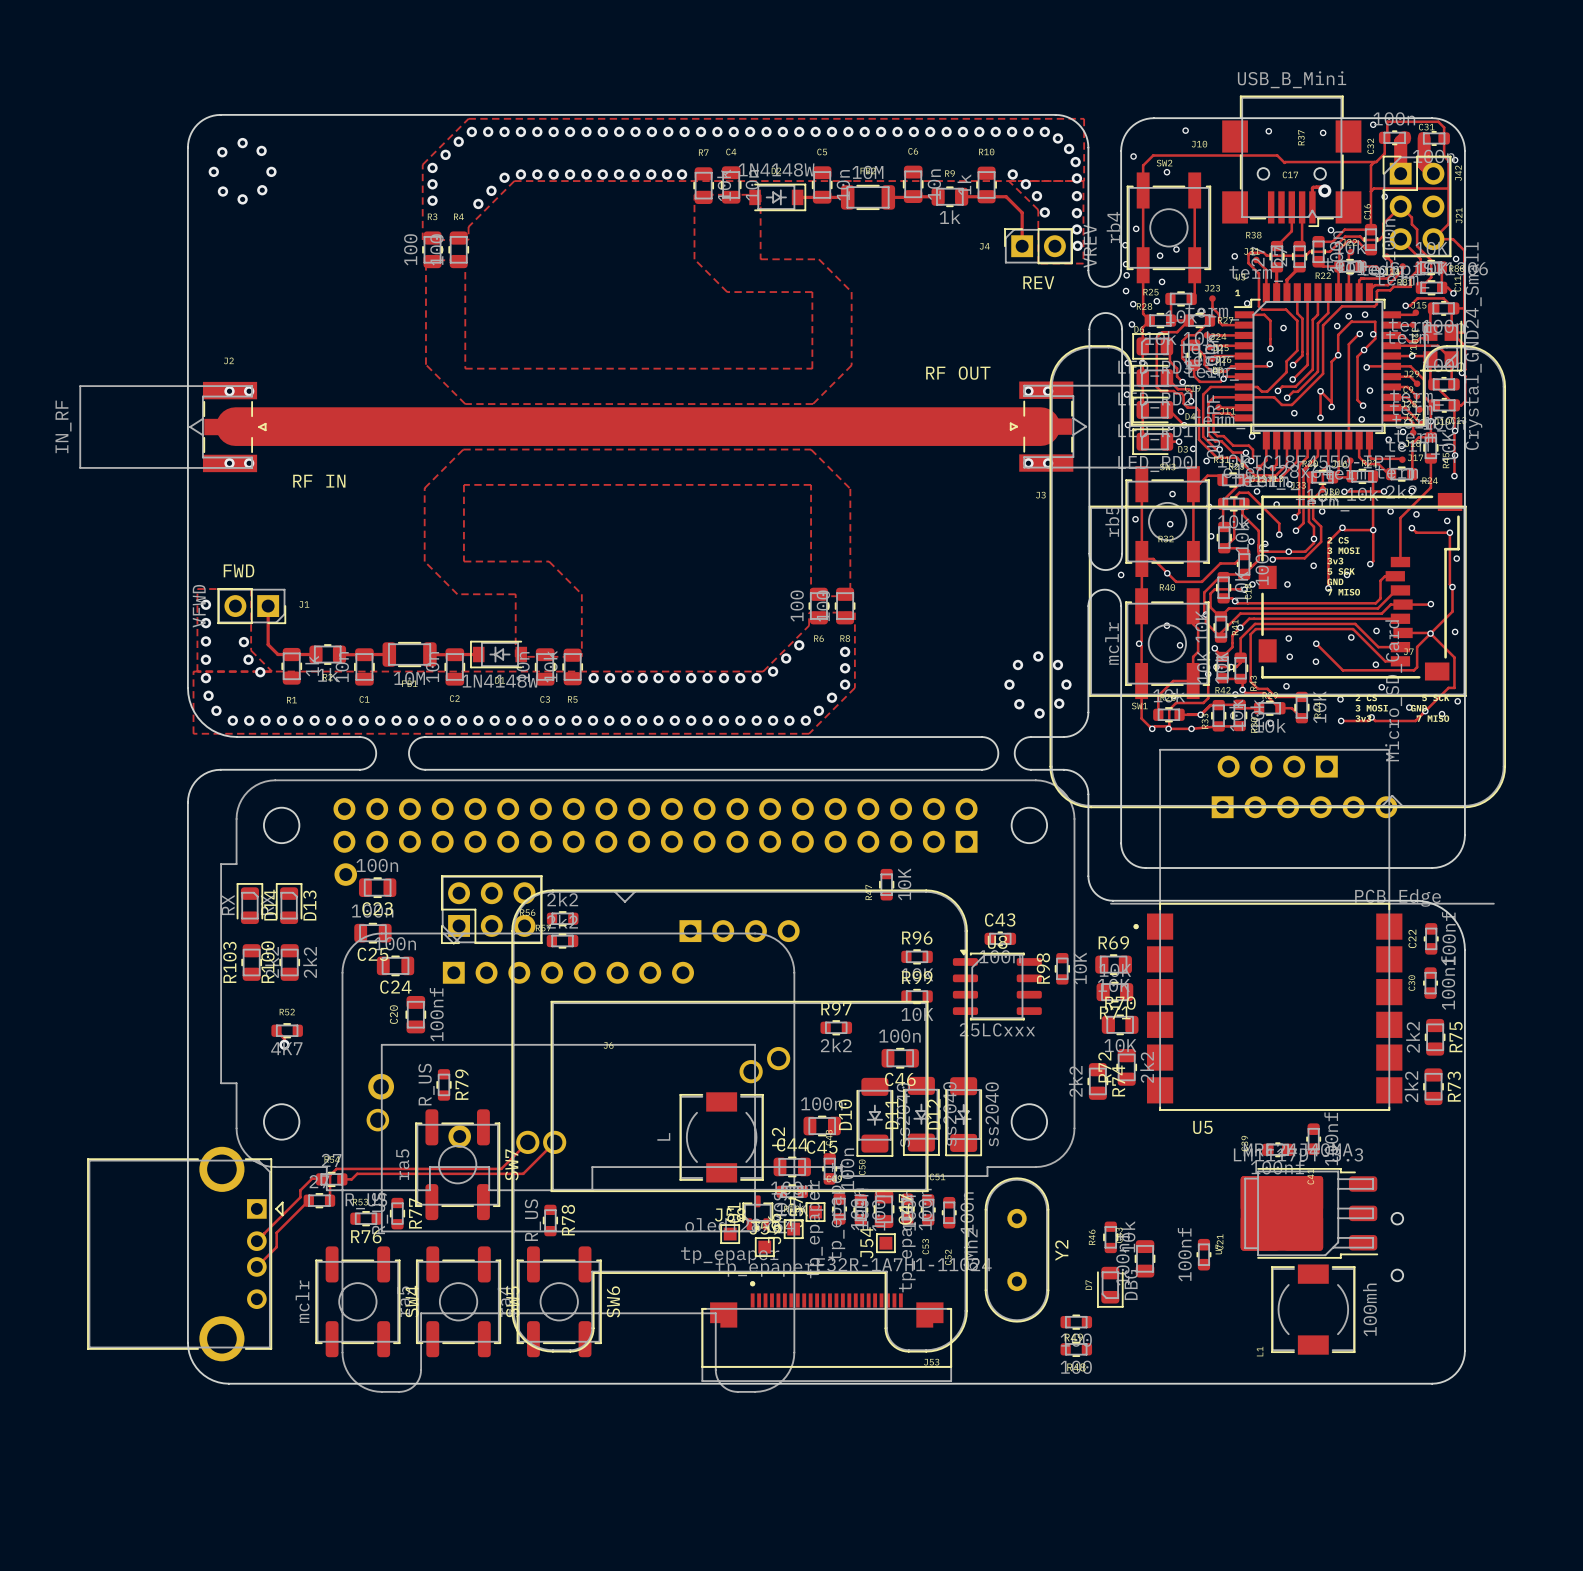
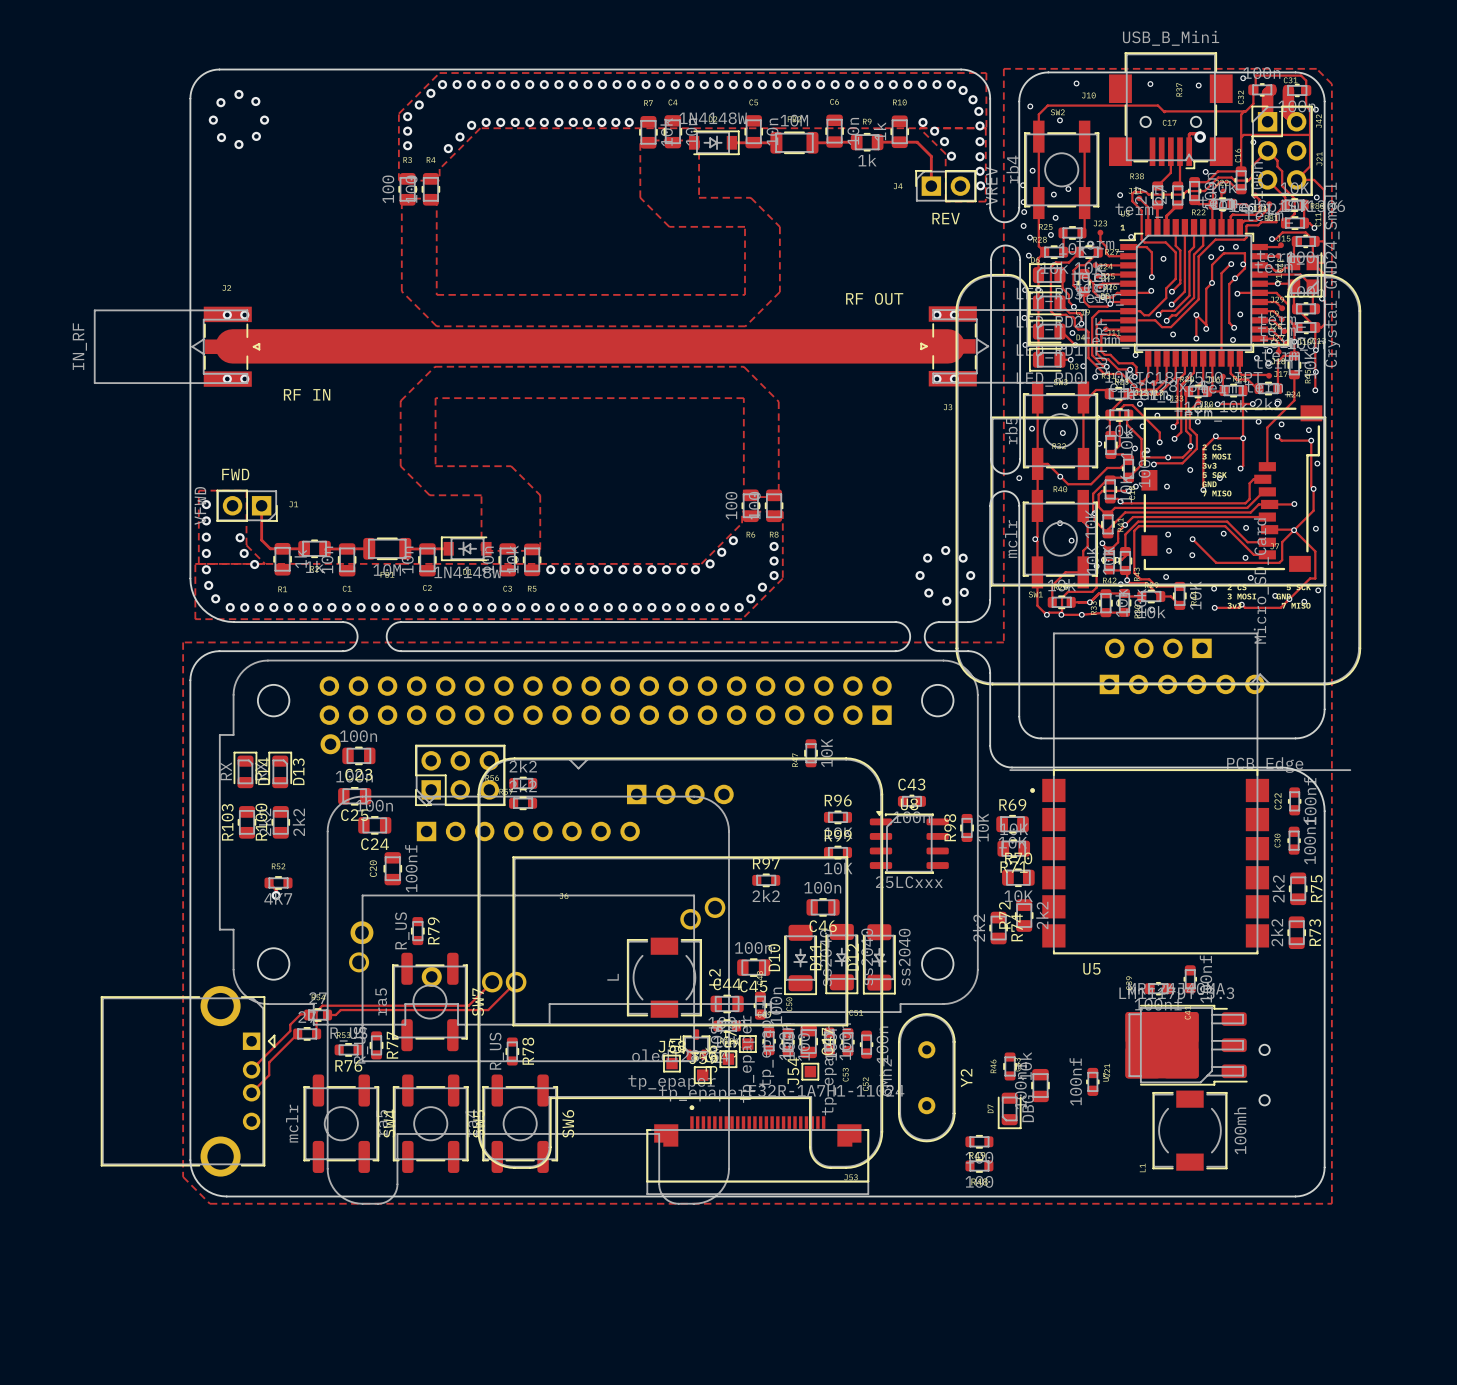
zone outline: none -> (1003, 68) (1003, 642) (183, 642) (183, 1176) (209, 1203) (1331, 1203) (1331, 84) (1316, 68) (1003, 68)

